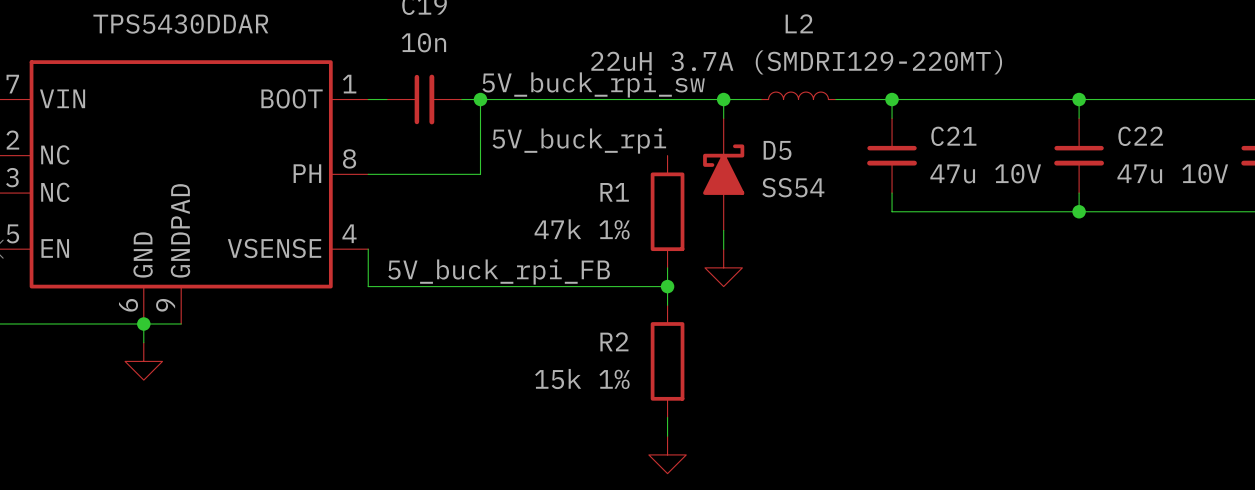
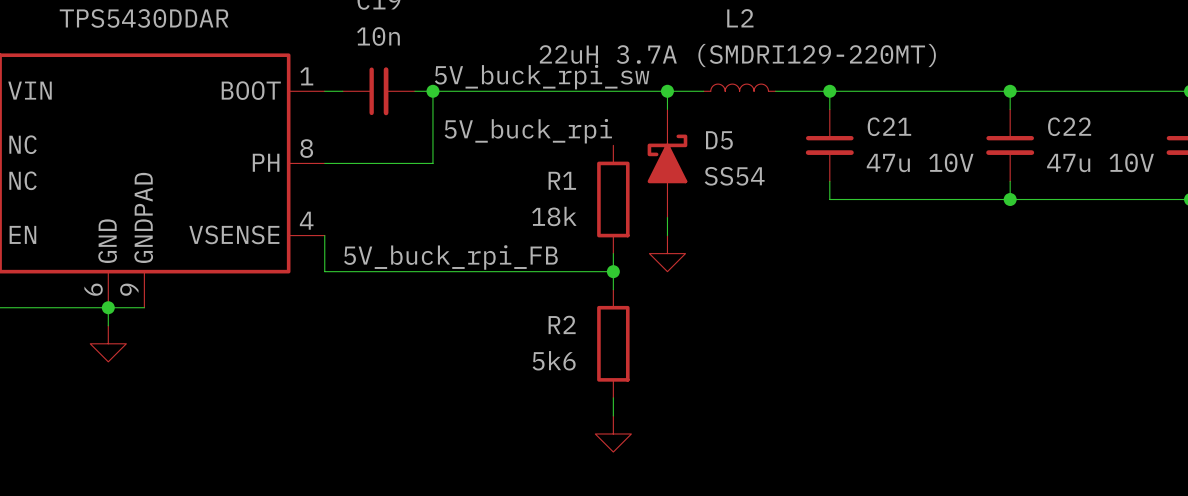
R1 value: 47k 1% (582, 229) -> 18k (554, 216)
R2 value: 15k 1% (582, 379) -> 5k6 (554, 360)

